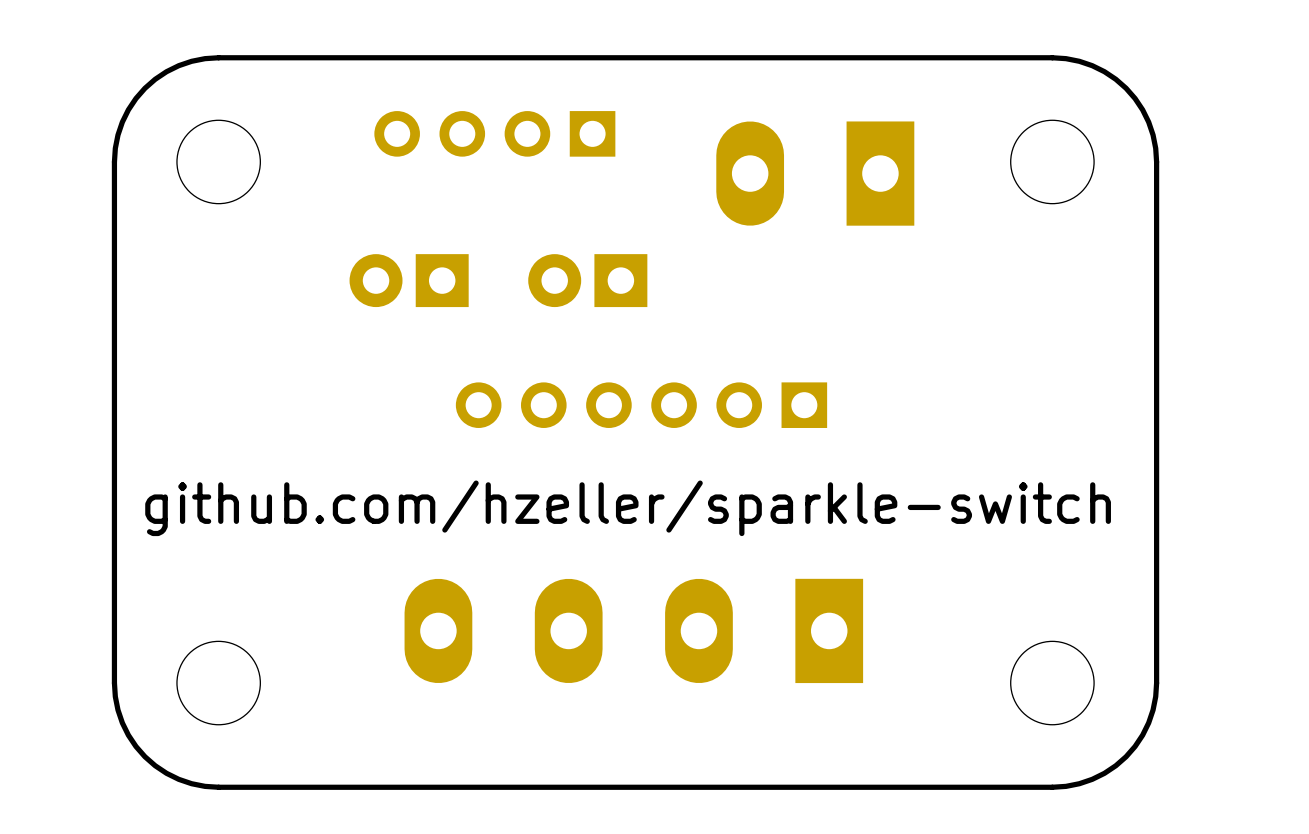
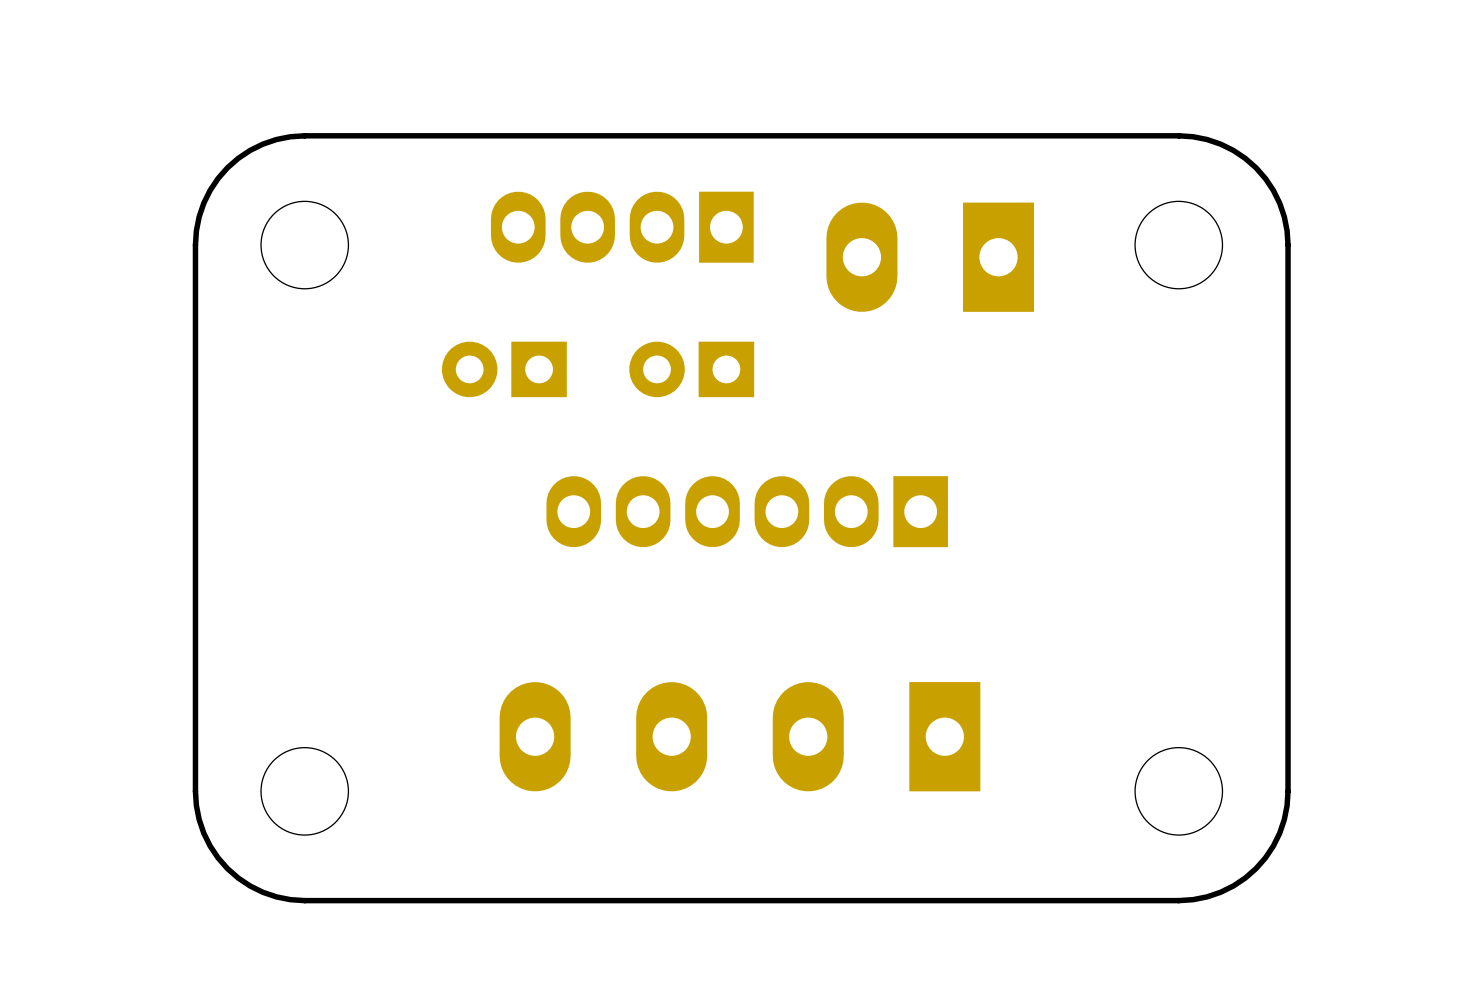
part: (494, 133) -> none
part: none -> (622, 227)
part footprint: [455, 382, 828, 428] -> [546, 476, 948, 548]
text: github.com/hzeller/sparkle-switch (628, 508) -> none

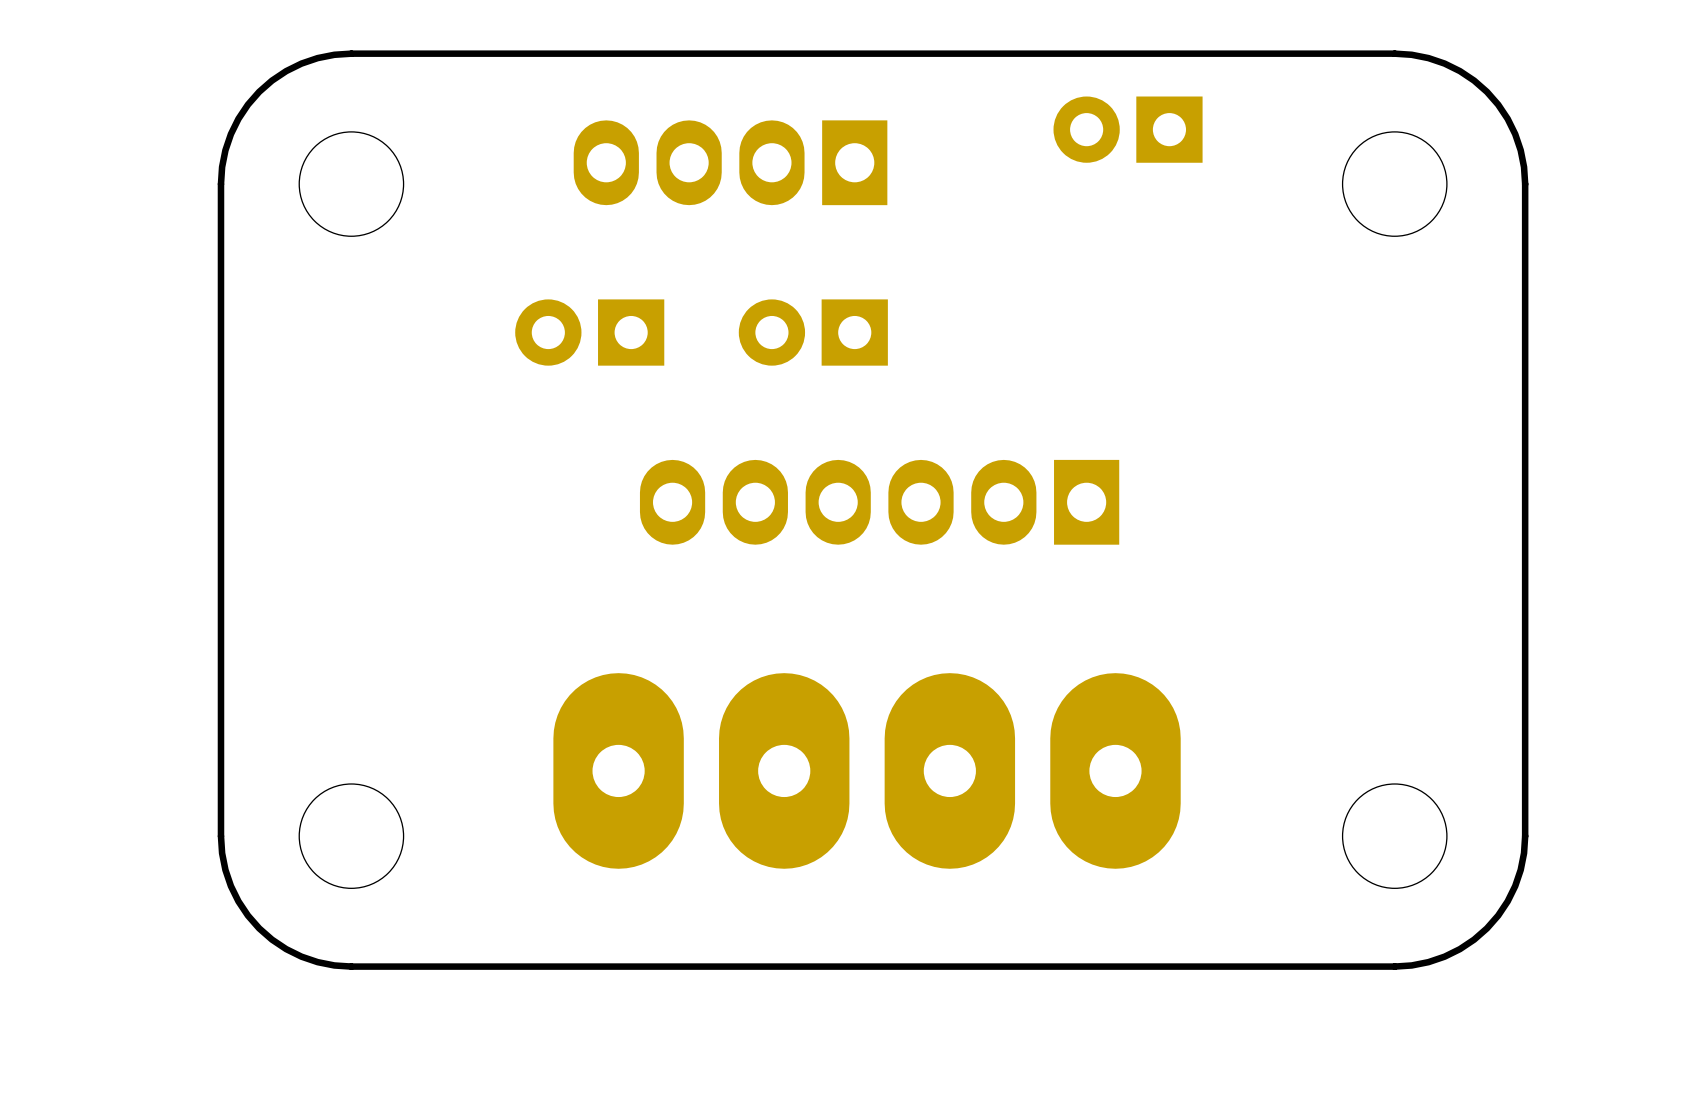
part: none -> (1128, 129)
part: (930, 257) -> none
part footprint: [499, 682, 981, 792] -> [553, 673, 1181, 869]

